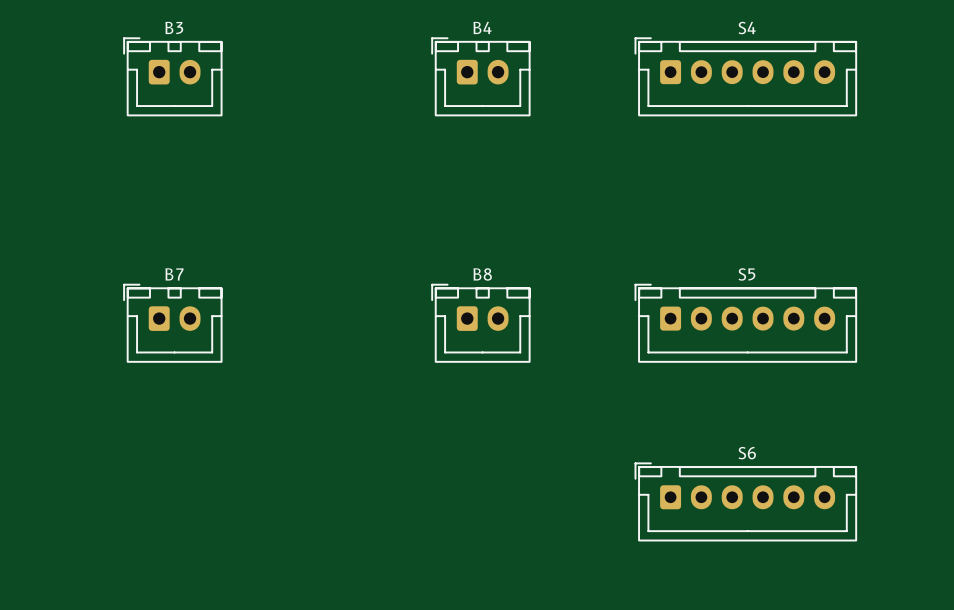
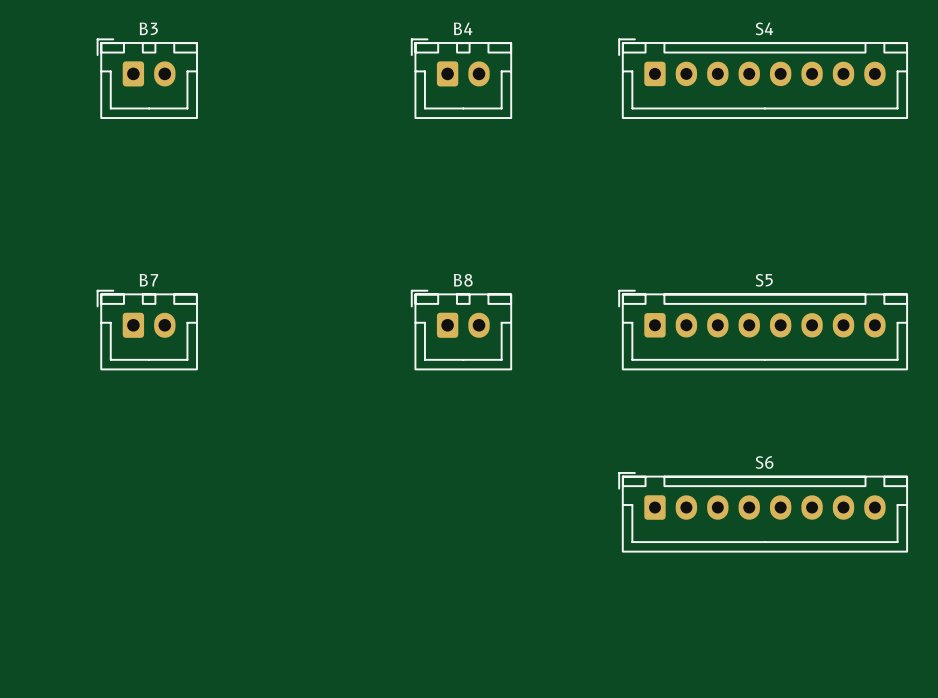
S4 footprint: [634, 37, 857, 117] -> [618, 38, 908, 119]
S5 footprint: [634, 283, 857, 363] -> [618, 289, 908, 371]
S6 footprint: [634, 462, 857, 542] -> [618, 472, 908, 553]

